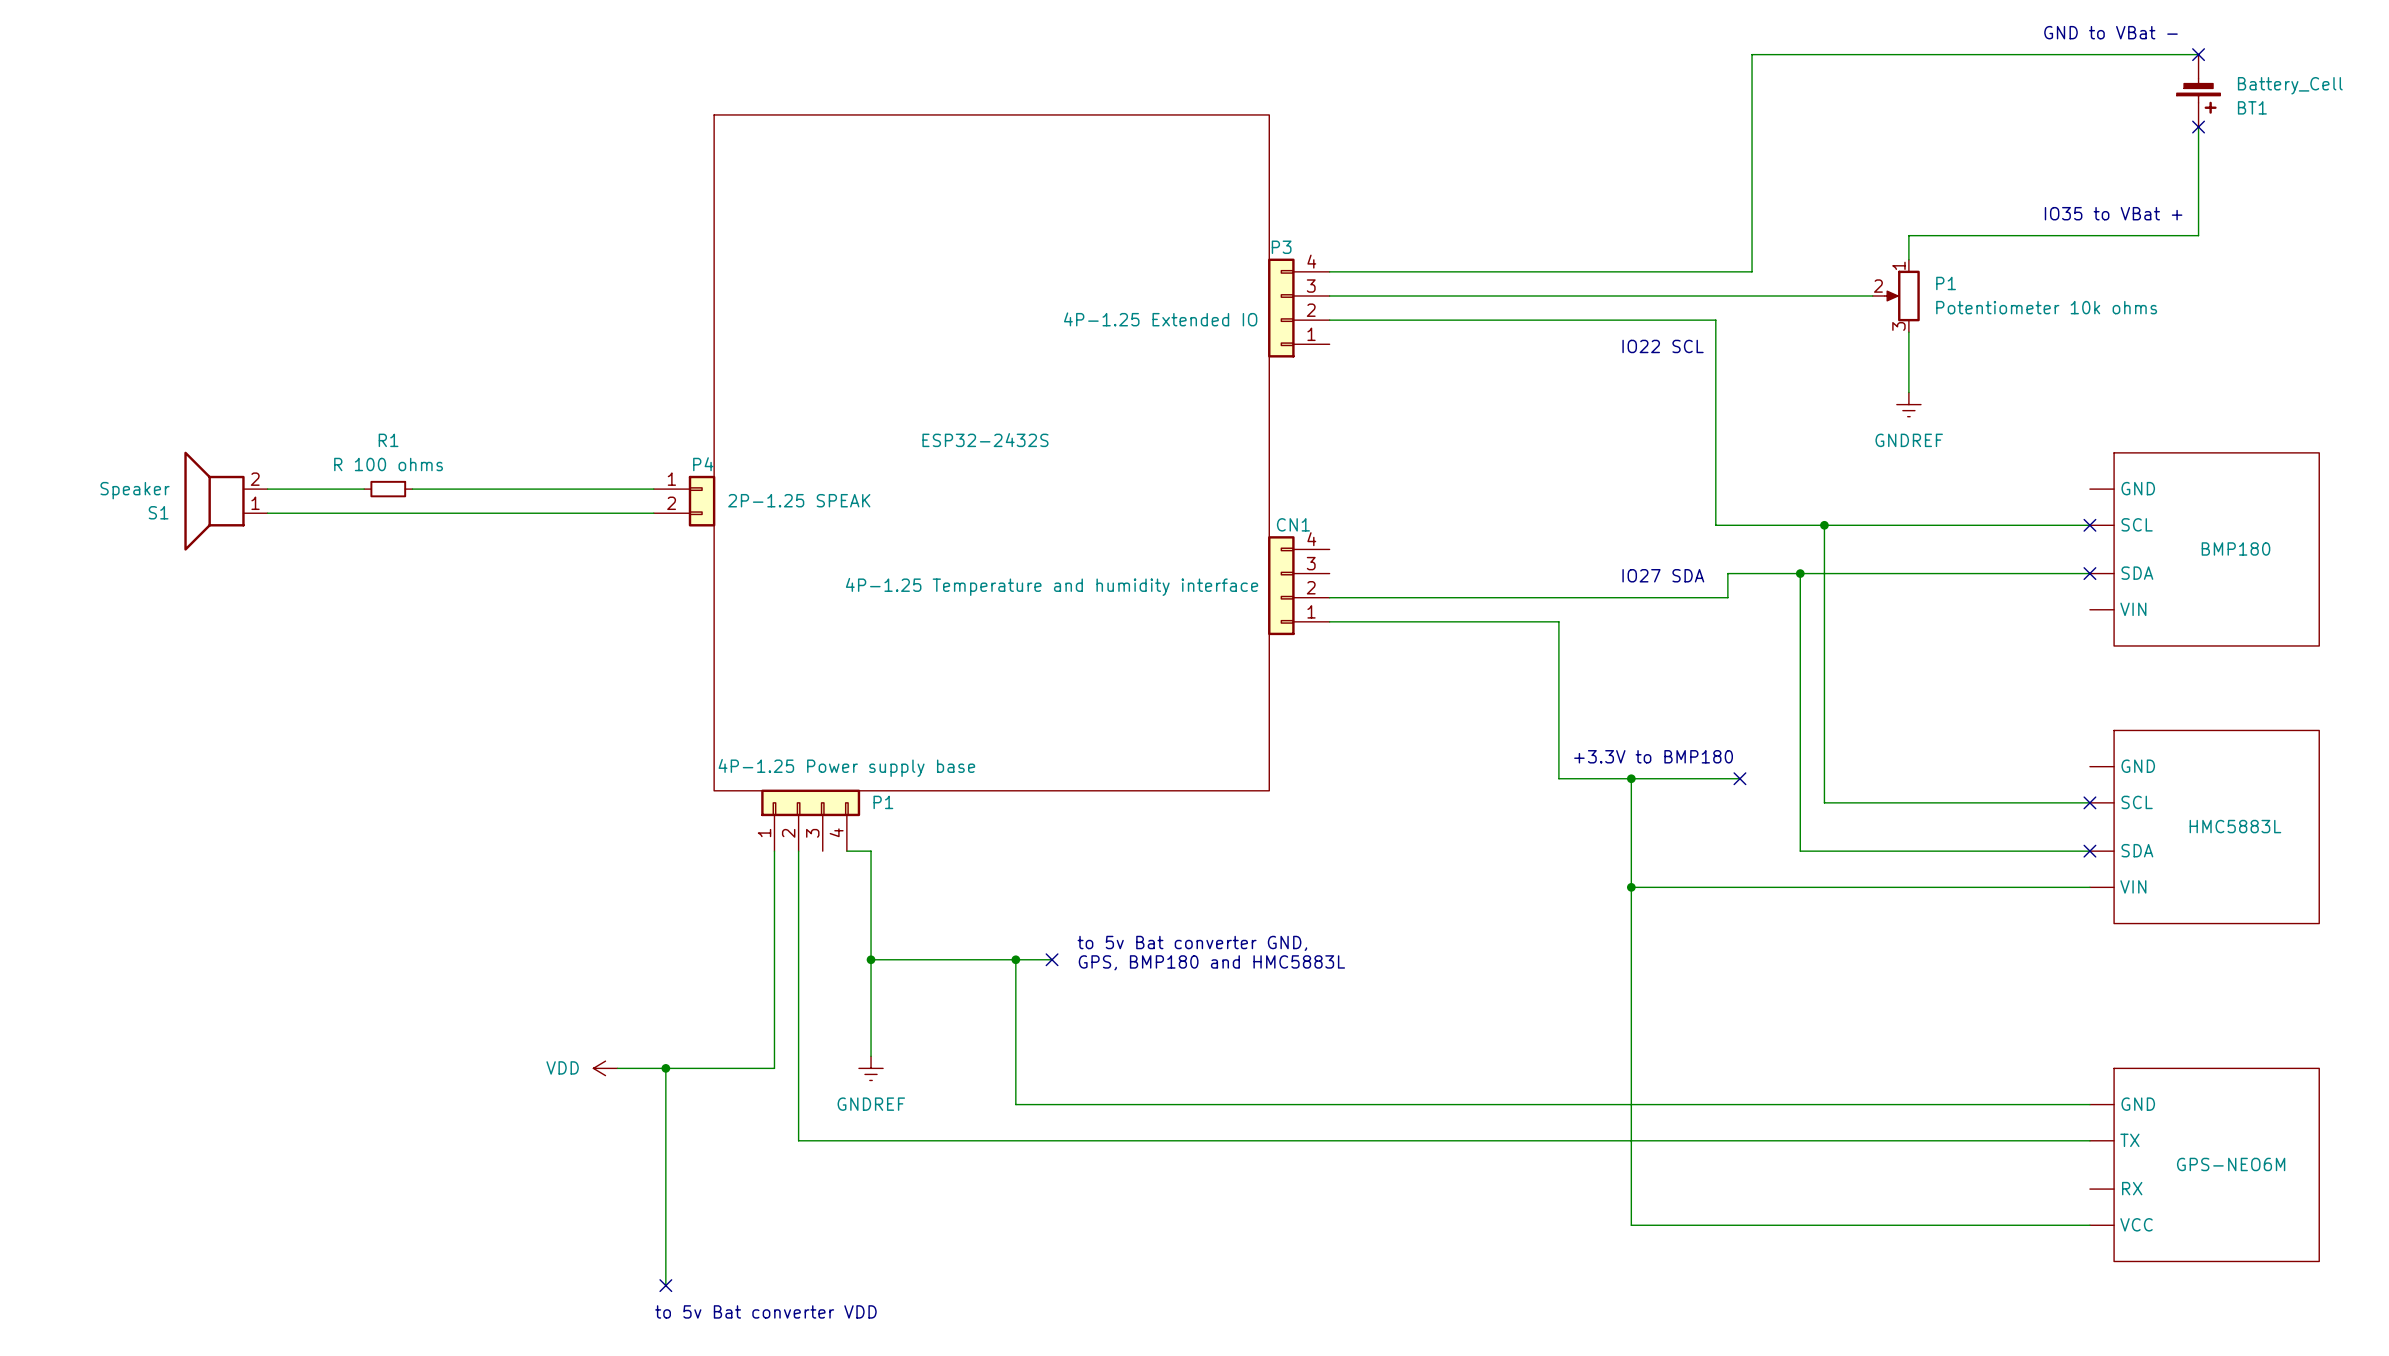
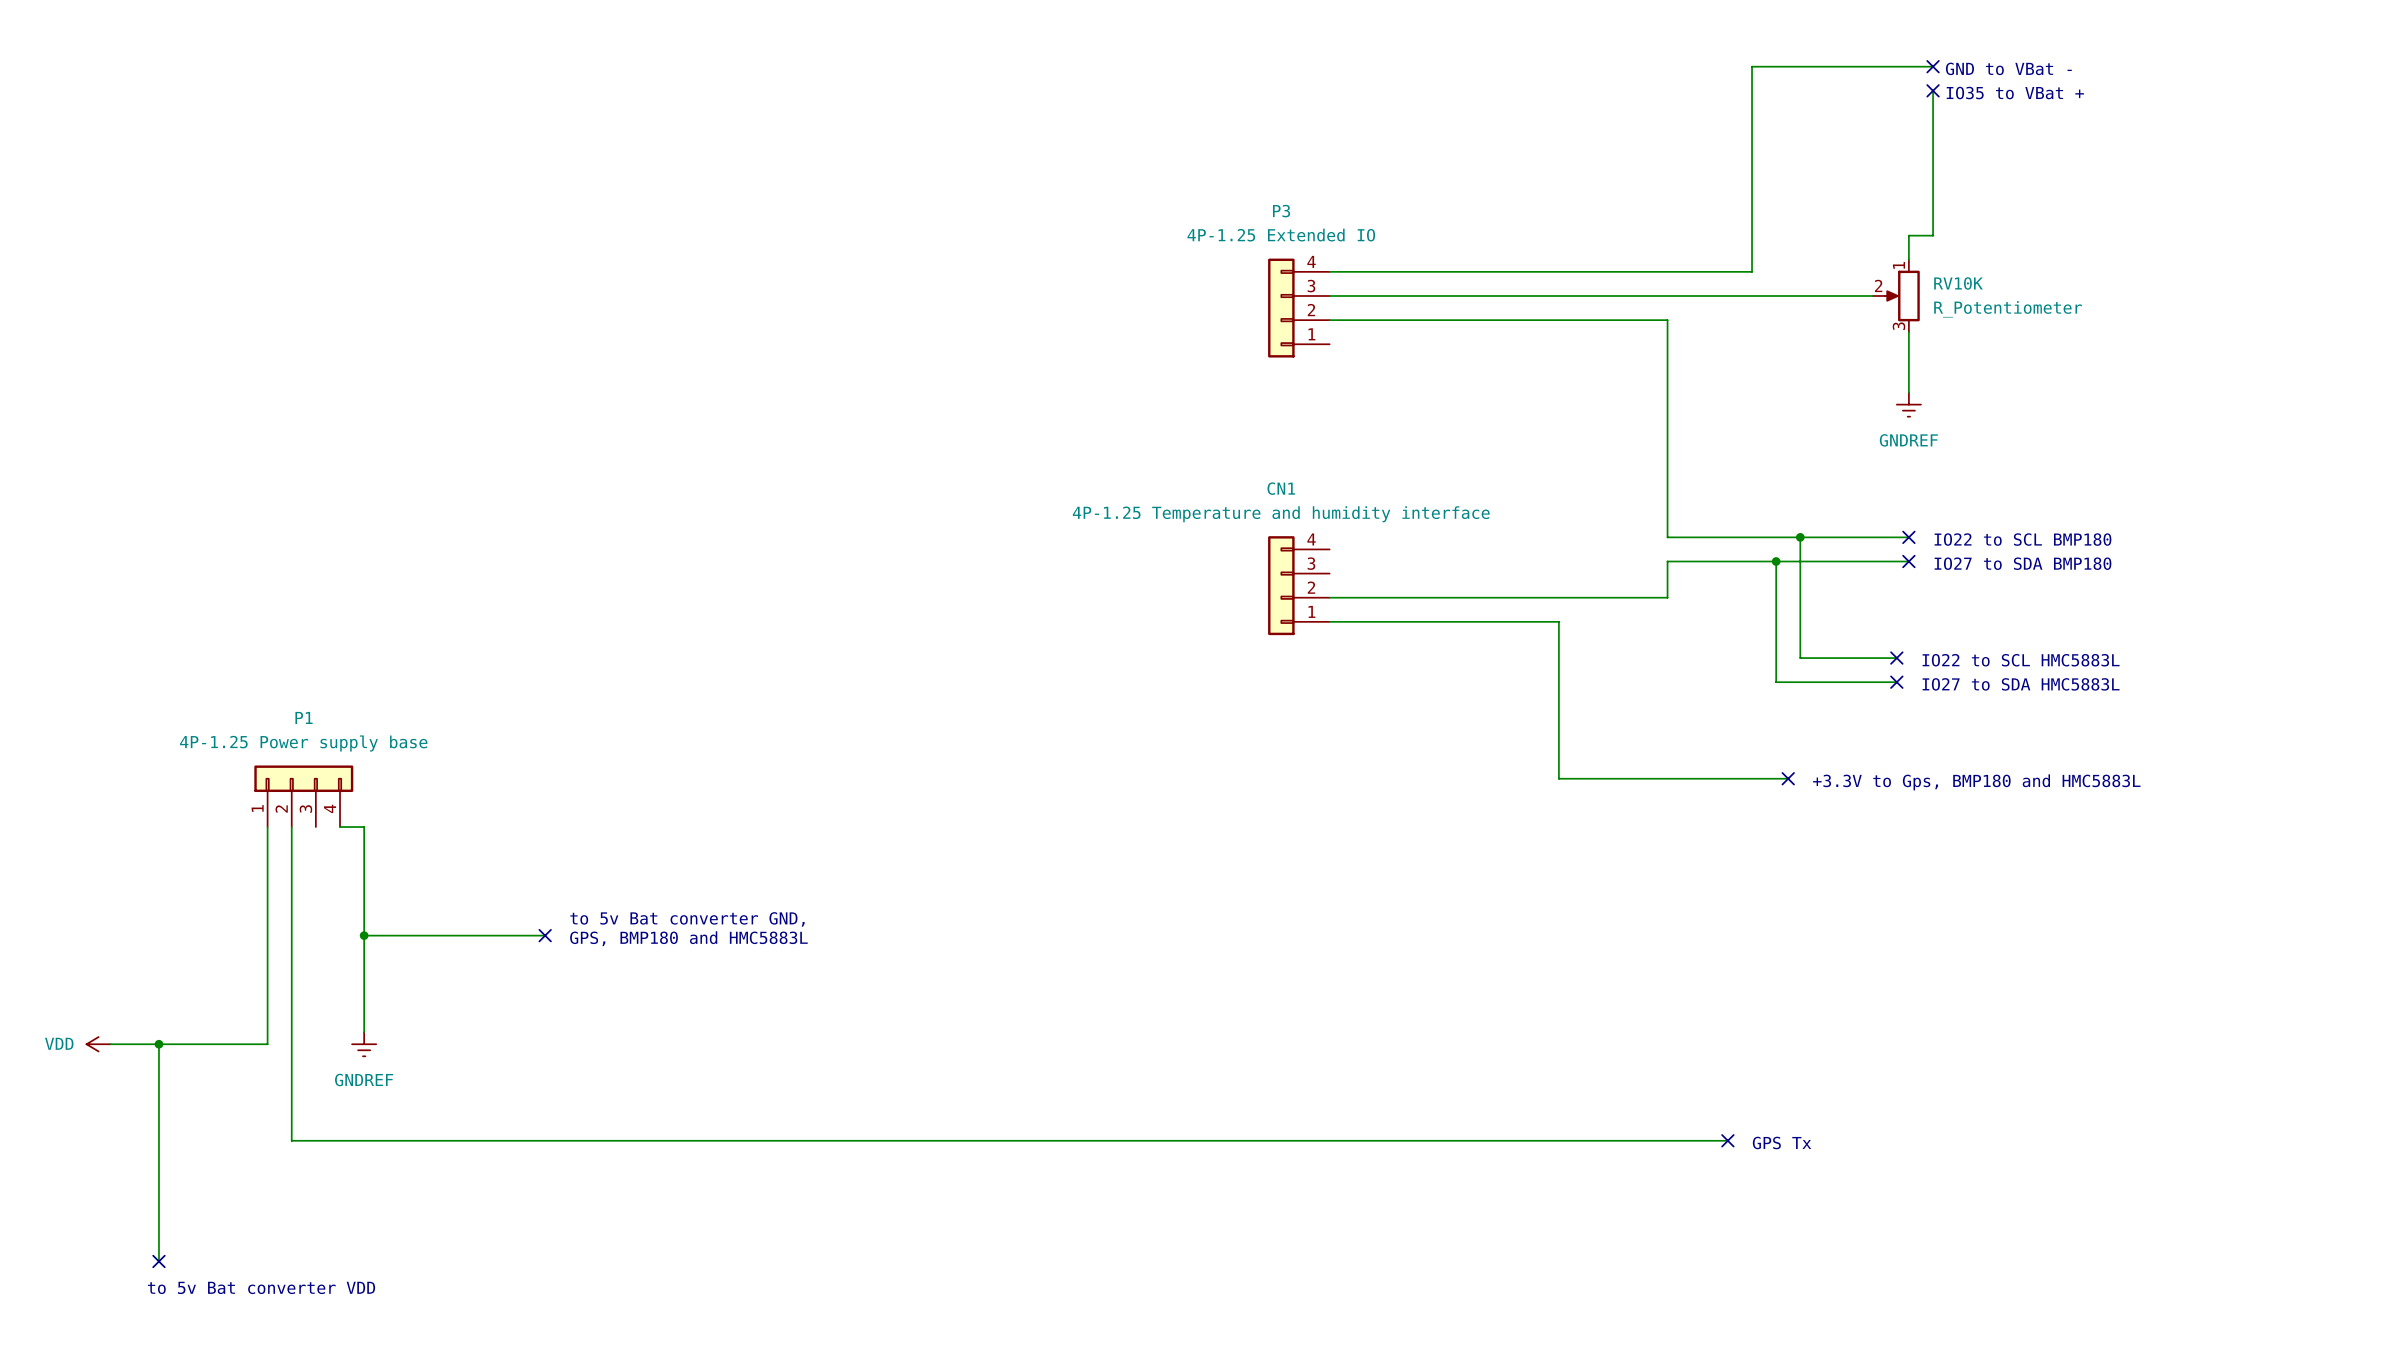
text position: GND to VBat - (2111, 32) -> GND to VBat - (2008, 68)
wire: (2198, 54) (1752, 54) (1752, 66) -> (1933, 66) (1752, 66)
no-connect mark: (2198, 54) -> none
no-connect mark: none -> (1933, 66)
no-connect mark: none -> (1933, 90)
BT1: Battery_Cell (2198, 90) -> none
wire: (2198, 127) (2198, 235) (1933, 235) -> (1933, 90) (1933, 235)
no-connect mark: (2198, 127) -> none
text position: IO35 to VBat + (2113, 213) -> IO35 to VBat + (2015, 93)
P3 name position: P3 (1281, 247) -> P3 (1281, 211)
P1 name: P1 (1946, 283) -> RV10K (1958, 283)
P1 value: Potentiometer 10k ohms (2046, 307) -> R_Potentiometer (2008, 309)
P3 value position: 4P-1.25 Extended IO (1160, 319) -> 4P-1.25 Extended IO (1281, 235)
wire: (1667, 320) (1715, 320) (1715, 525) (2089, 525) -> (1667, 320) (1667, 537) (1908, 537)
text: IO22 SCL (1663, 346) -> none
ESP32-2432S: (991, 452) -> none
wire: (267, 489) (364, 489) -> none
R1: R 100 ohms (388, 489) -> none
wire: (412, 489) (653, 489) -> none
S1: Speaker (225, 501) -> none
P4: 2P-1.25 SPEAK (684, 501) -> none
wire: (267, 513) (653, 513) -> none
CN1 name position: CN1 (1293, 524) -> CN1 (1281, 488)
wire: (1824, 525) (1824, 802) (2089, 802) -> none
junction: (1824, 525) -> none
no-connect mark: (2089, 525) -> none
wire: none -> (1800, 537) (1800, 573)
junction: none -> (1800, 537)
no-connect mark: none -> (1908, 537)
text: none -> IO22 to SCL BMP180 (2023, 539)
BMP180: (2204, 549) -> none
wire: none -> (1776, 561) (1776, 682) (1896, 682)
junction: none -> (1776, 561)
no-connect mark: none -> (1908, 561)
text: none -> IO27 to SDA BMP180 (2023, 563)
junction: (1800, 573) -> none
wire: (2089, 573) (1727, 573) (1727, 597) (1667, 597) -> (1908, 561) (1667, 561) (1667, 597)
no-connect mark: (2089, 573) -> none
text: IO27 SDA (1663, 575) -> none
CN1 value position: 4P-1.25 Temperature and humidity interface (1052, 586) -> 4P-1.25 Temperature and humidity interface (1281, 514)
wire: (1800, 658) (1800, 851) (2089, 851) -> (1800, 658) (1896, 658)
no-connect mark: none -> (1896, 658)
text: none -> IO22 to SCL HMC5883L (2021, 660)
no-connect mark: none -> (1896, 682)
text: none -> IO27 to SDA HMC5883L (2021, 684)
text: +3.3V to BMP180 (1653, 756) -> none
wire: (1631, 778) (1631, 1225) (2089, 1225) -> none
junction: (1631, 778) -> none
wire: none -> (1739, 778) (1788, 778)
no-connect mark position: (1739, 778) -> (1788, 778)
text: none -> +3.3V to Gps, BMP180 and HMC5883L (1976, 782)
P1: none -> 4P-1.25 Power supply base (303, 796)
no-connect mark: (2089, 802) -> none
P1: 4P-1.25 Power supply base (810, 820) -> none
wire: none -> (267, 827) (267, 1044) (110, 1044)
wire: none -> (340, 827) (364, 827) (364, 1032)
HMC5883L: (2204, 827) -> none
wire: (774, 851) (774, 1068) (617, 1068) -> none
wire: (798, 851) (798, 1140) -> (291, 827) (291, 1140) (798, 1140)
wire: (846, 851) (871, 851) (871, 1056) -> none
no-connect mark: (2089, 851) -> none
wire: (1631, 887) (2089, 887) -> none
junction: (1631, 887) -> none
text: none -> to 5v Bat converter GND, (687, 919)
wire: none -> (364, 935) (545, 935)
junction: none -> (364, 935)
no-connect mark: none -> (545, 935)
text: none -> GPS, BMP180 and HMC5883L (688, 938)
text: to 5v Bat converter GND, (1192, 943) -> none
wire: (871, 959) (1052, 959) -> none
junction: (871, 959) -> none
wire: (1015, 959) (1015, 1104) (2089, 1104) -> none
junction: (1015, 959) -> none
no-connect mark: (1052, 959) -> none
text: GPS, BMP180 and HMC5883L (1211, 962) -> none
power symbol: none -> VDD (98, 1044)
wire: none -> (158, 1044) (158, 1261)
junction: none -> (158, 1044)
power symbol: none -> GNDREF (364, 1044)
power symbol: VDD (605, 1068) -> none
wire: (665, 1068) (665, 1285) -> none
junction: (665, 1068) -> none
power symbol: GNDREF (871, 1068) -> none
wire: (1727, 1140) (2089, 1140) -> none
no-connect mark: none -> (1727, 1140)
text: none -> GPS Tx (1782, 1142)
GPS-NEO6M: (2204, 1164) -> none
no-connect mark: none -> (158, 1261)
no-connect mark: (665, 1285) -> none
text: none -> to 5v Bat converter VDD (261, 1287)
text: to 5v Bat converter VDD (765, 1311) -> none

